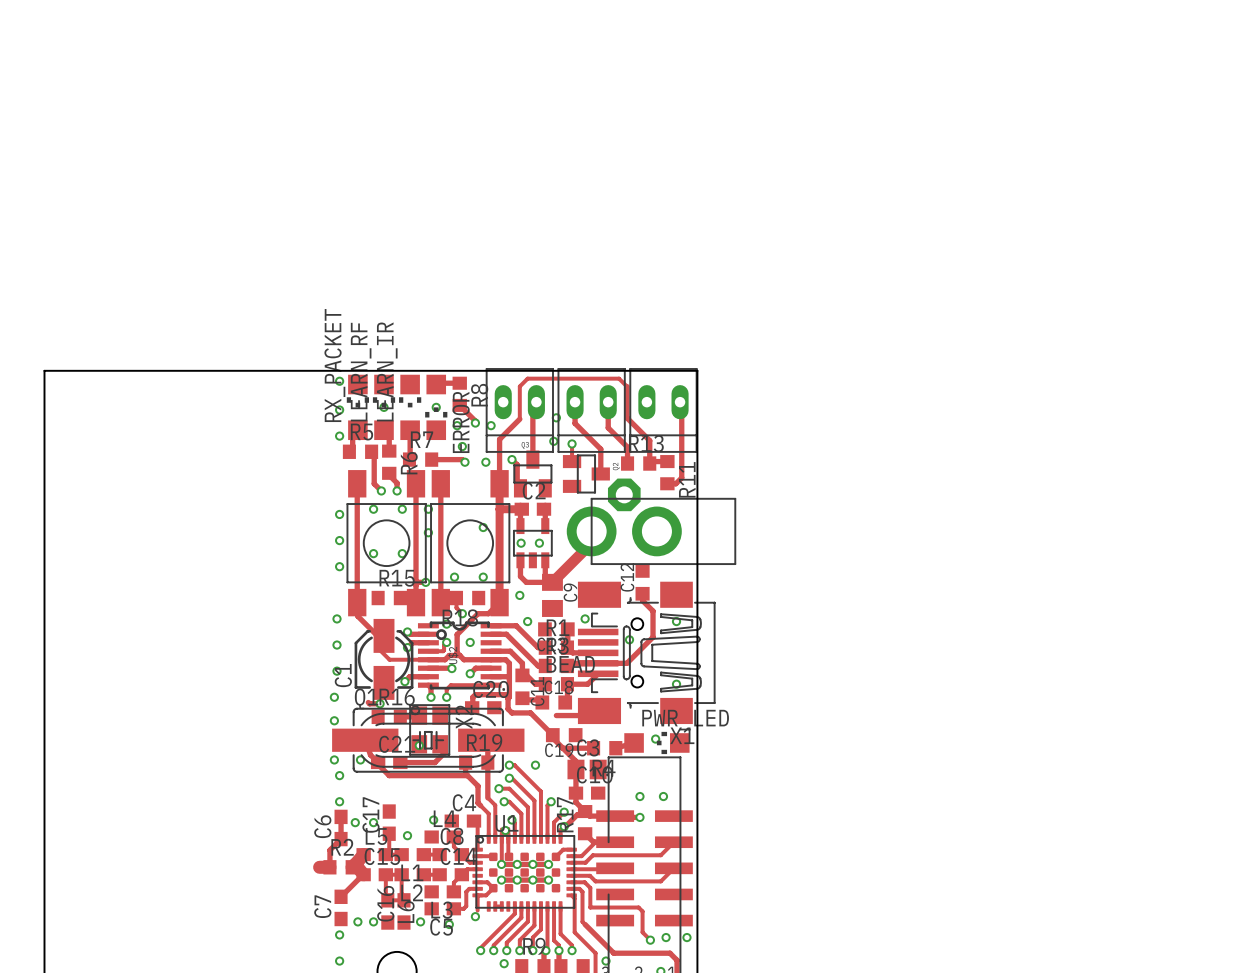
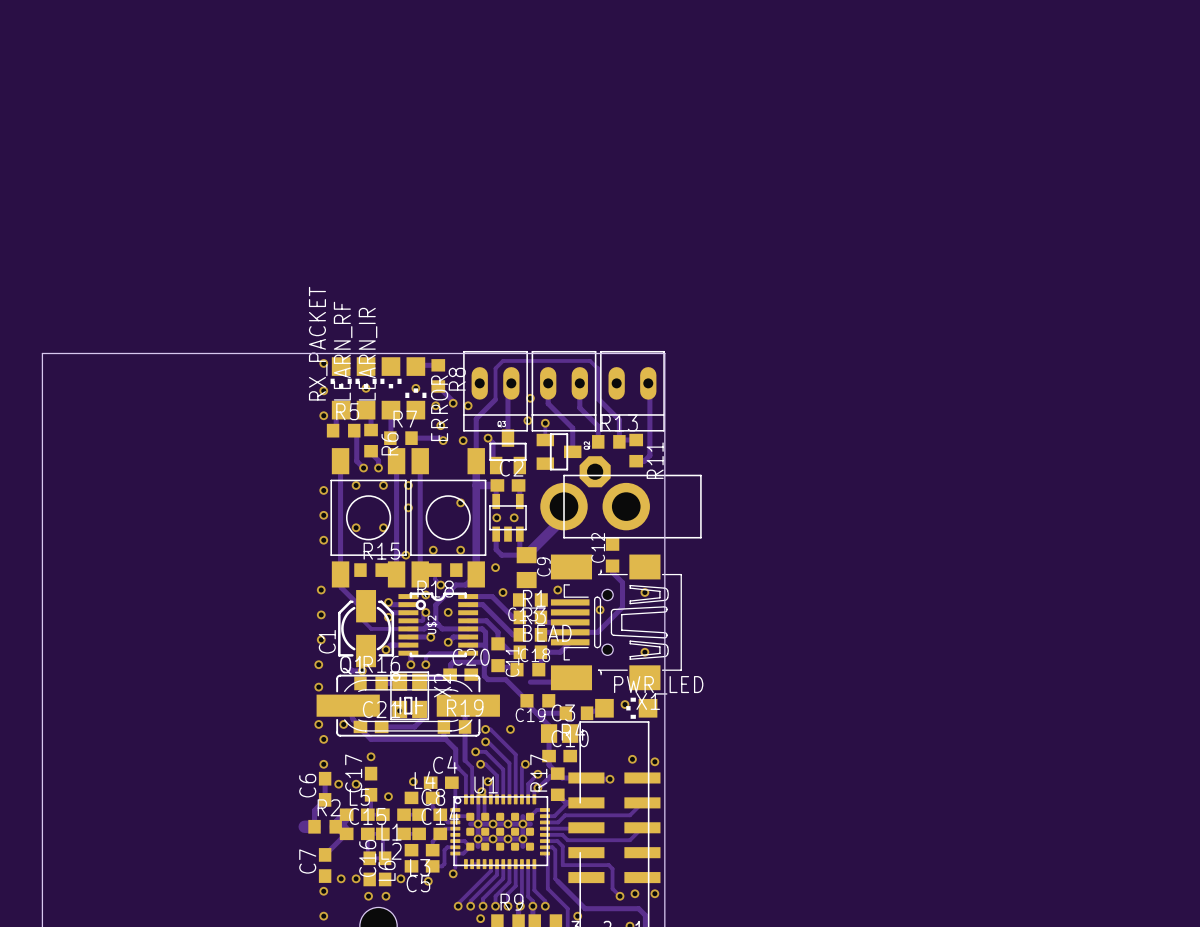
via: none -> (371, 756)
via position: (639, 796) -> (654, 761)
track: none -> (522, 816) (522, 846)
track: none -> (470, 824) (478, 824) (478, 846)
track: none -> (522, 824) (530, 824)
via: none -> (368, 896)
via: none -> (385, 896)

